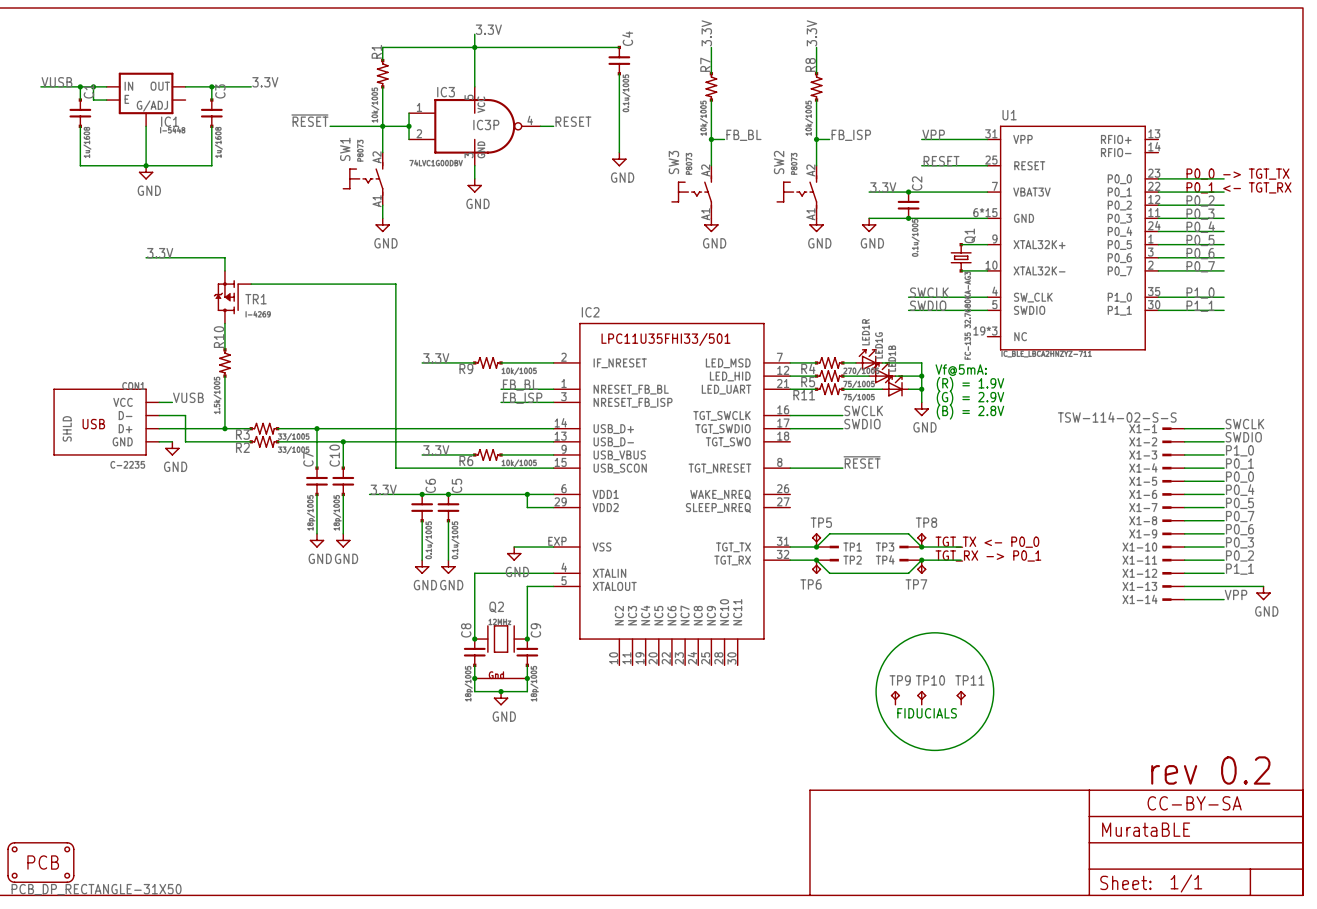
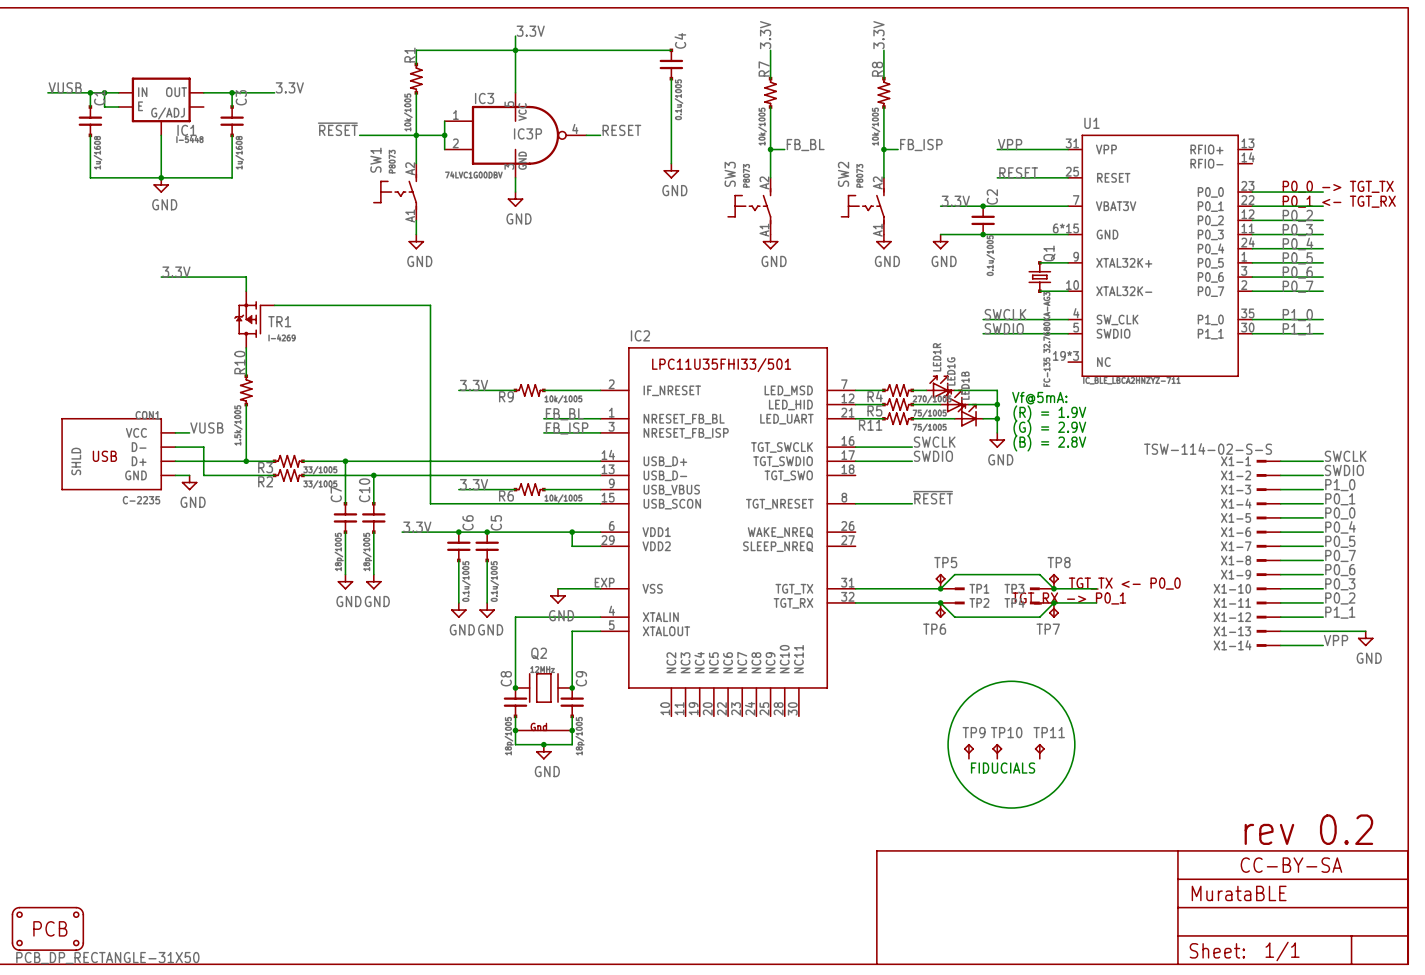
wire: (882, 533) (829, 533) (816, 547) -> (954, 574) (940, 588) (883, 588)
wire: (908, 533) (921, 547) (961, 547) -> (983, 574) (1039, 574) (1053, 588) (1096, 588)
TP5 position: (816, 540) -> (940, 581)
TP8 position: (921, 540) -> (1053, 581)
text position: TGT_TX <- P0_0 (987, 542) -> TGT_TX <- P0_0 (1124, 583)
junction: (816, 547) -> none
TP1 position: (827, 547) -> (952, 588)
junction: none -> (940, 588)
TP3 position: (910, 547) -> (1041, 588)
junction: (921, 547) -> none
junction: none -> (1053, 588)
wire: (816, 560) (829, 573) (882, 573) -> (883, 602) (940, 602) (954, 617)
junction: (816, 560) -> none
TP2 position: (827, 560) -> (952, 602)
junction: none -> (940, 602)
TP4 position: (910, 560) -> (1041, 602)
junction: (921, 560) -> none
wire: (961, 560) (921, 560) (908, 573) -> (1096, 602) (1053, 602) (1039, 617) (983, 617)
junction: none -> (1053, 602)
TP6 position: (816, 567) -> (940, 610)
TP7 position: (921, 567) -> (1053, 610)

